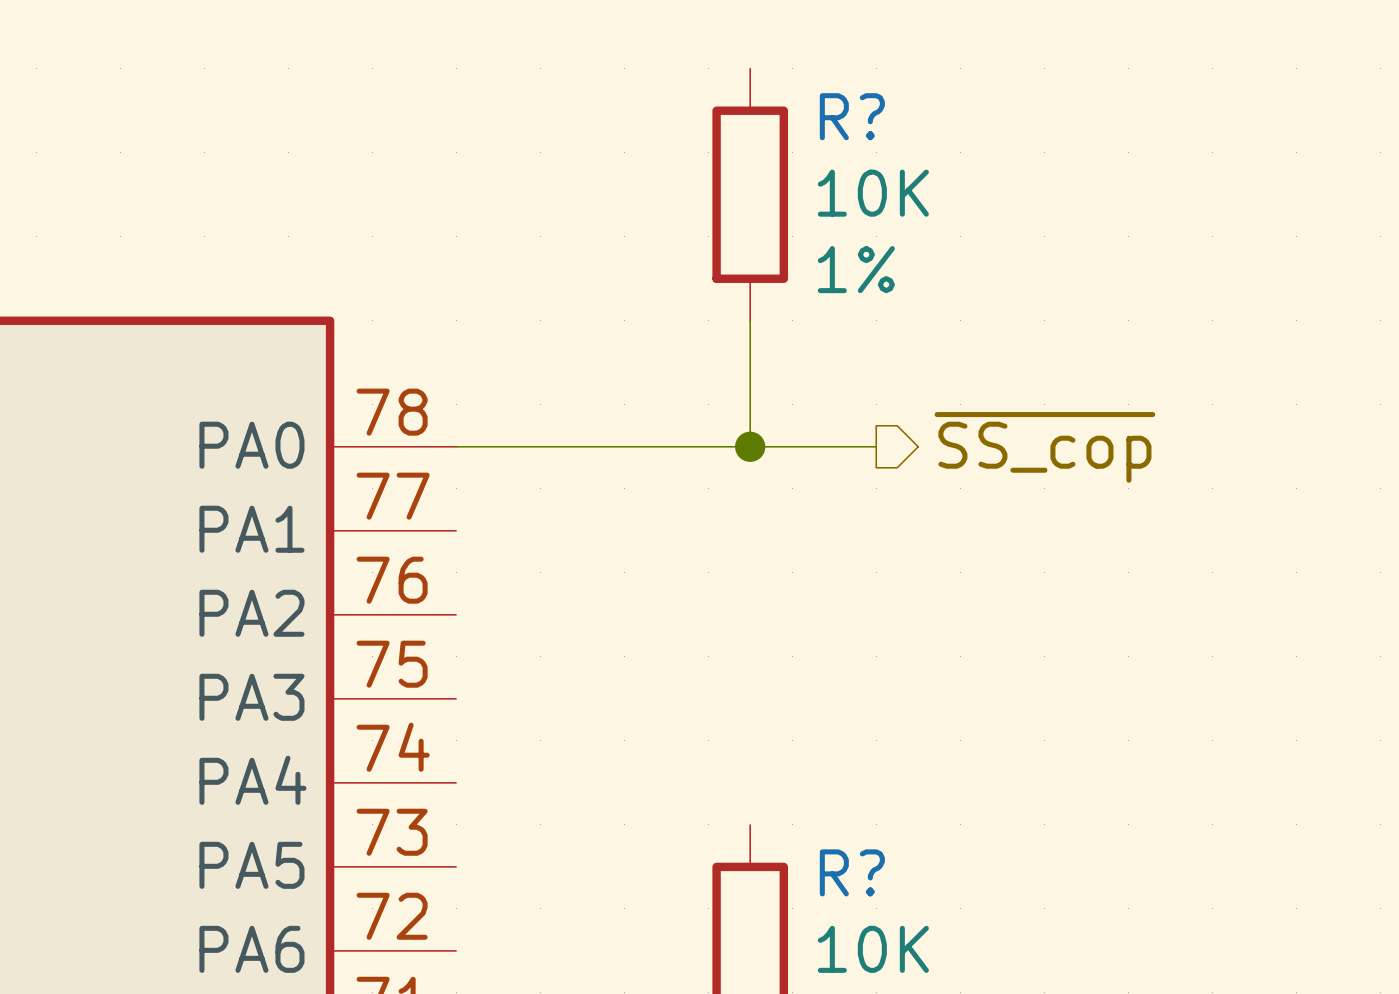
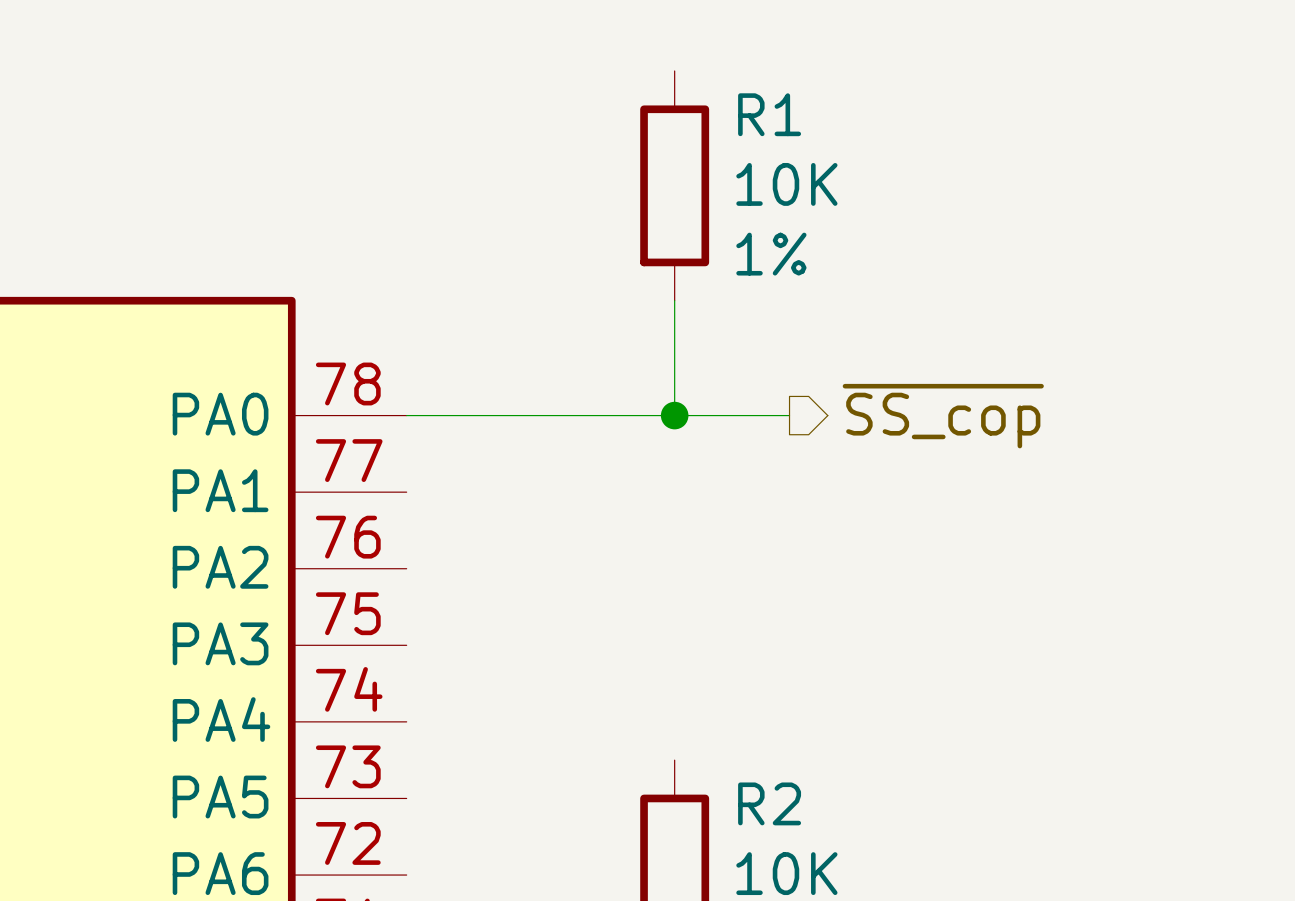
R? name: R? (852, 116) -> R1 (769, 114)
R? name: R? (852, 872) -> R2 (769, 803)

